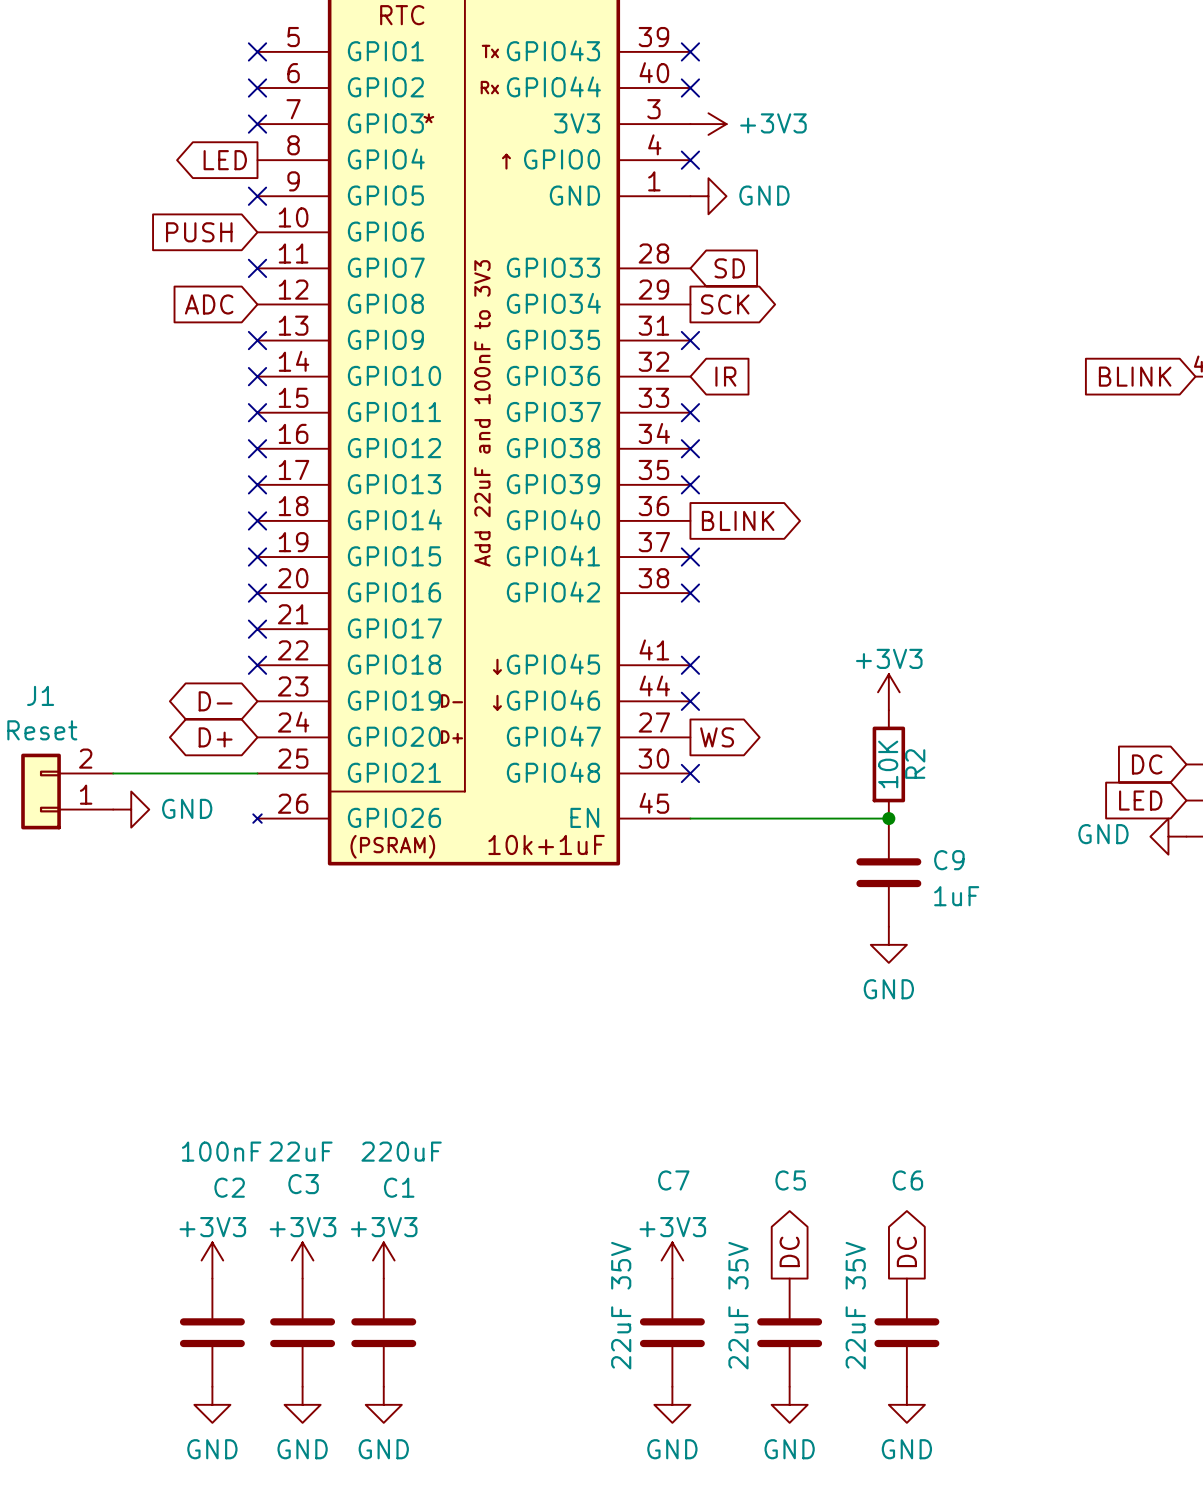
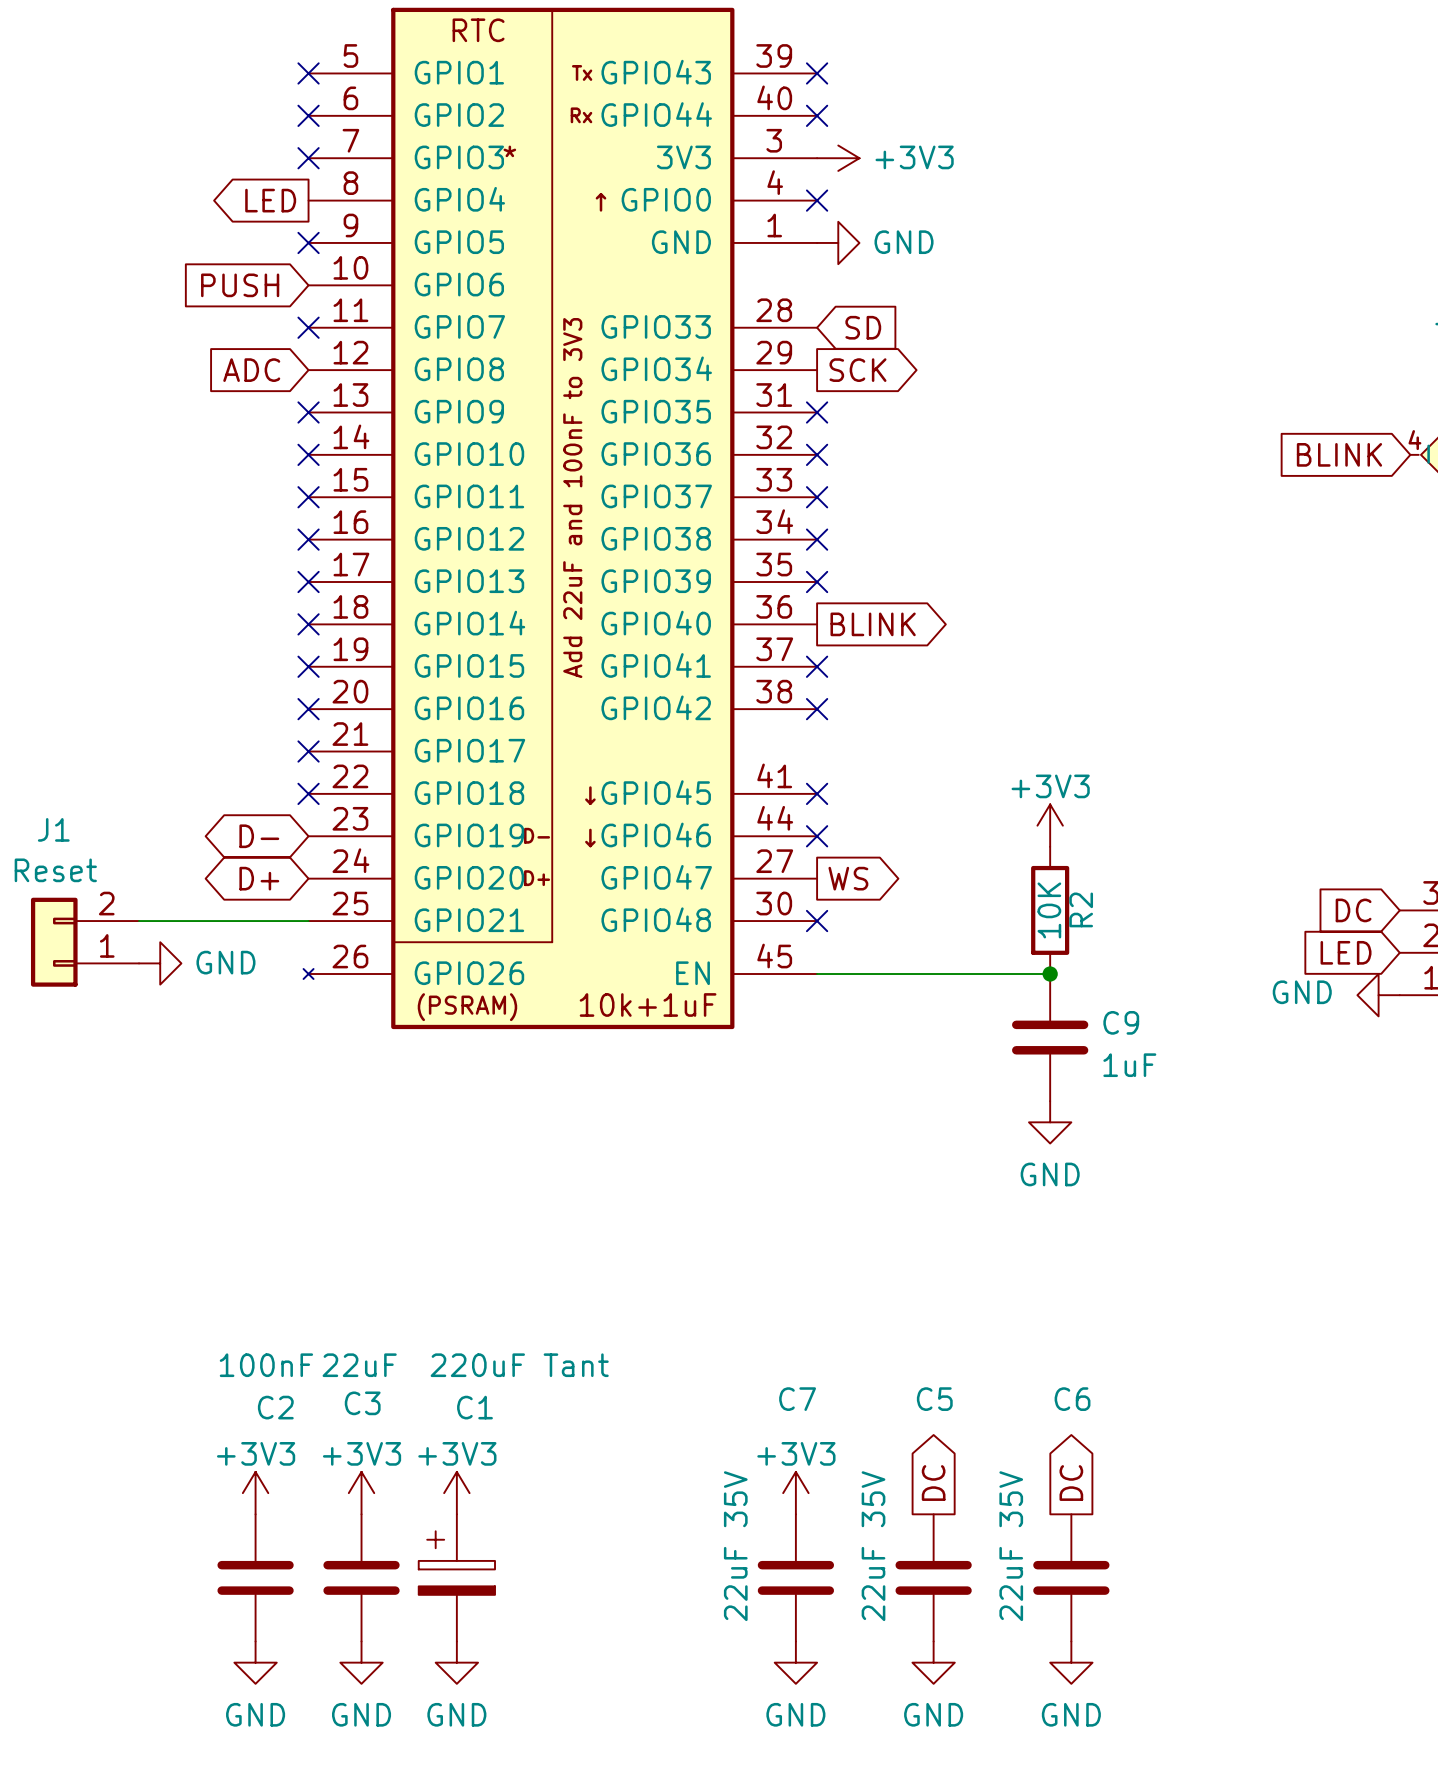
no-connect mark: none -> (817, 454)
global label: IR (725, 376) -> none
C1 value: 220uF (401, 1151) -> 220uF Tant (519, 1365)
C1 symbol: [351, 1278, 417, 1387] -> [418, 1514, 496, 1642]

